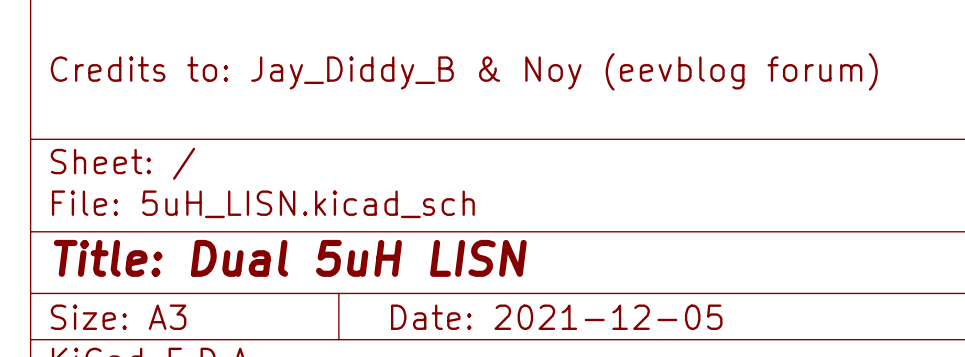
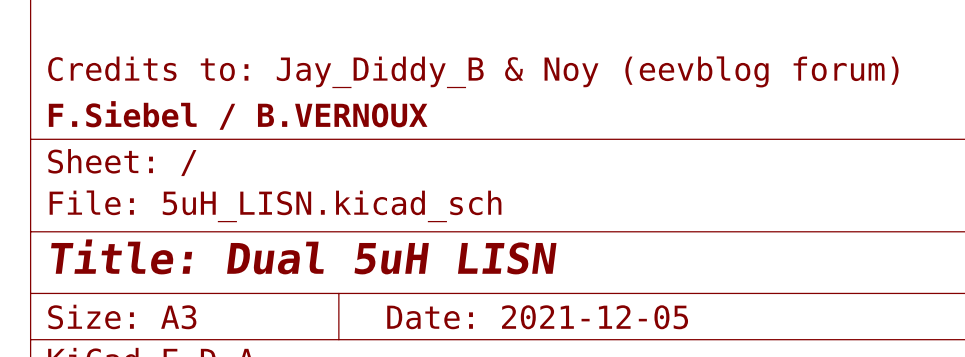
title block: none -> F.Siebel / B.VERNOUX (238, 115)

